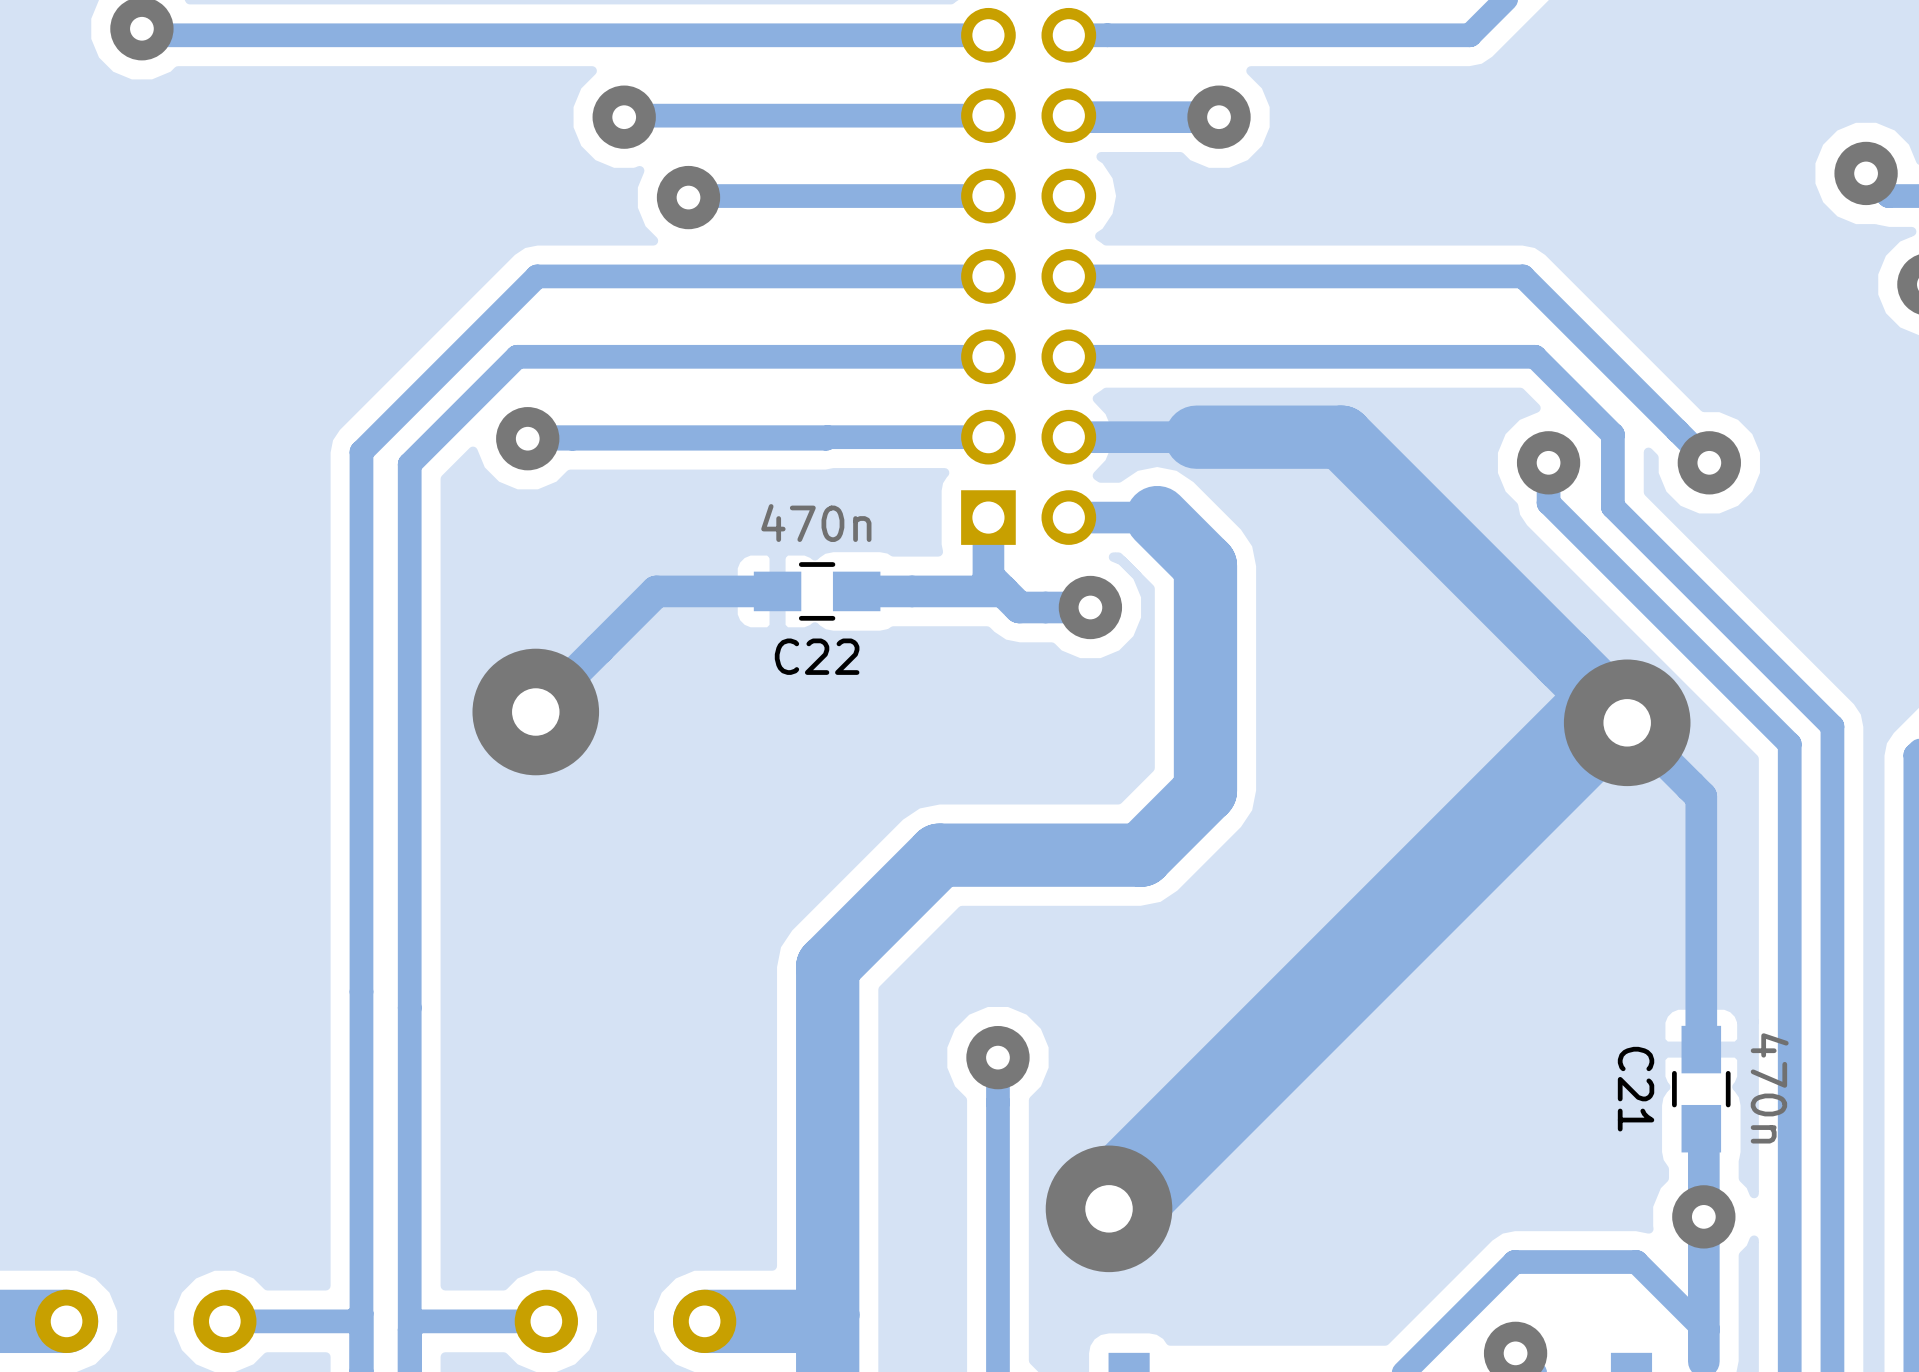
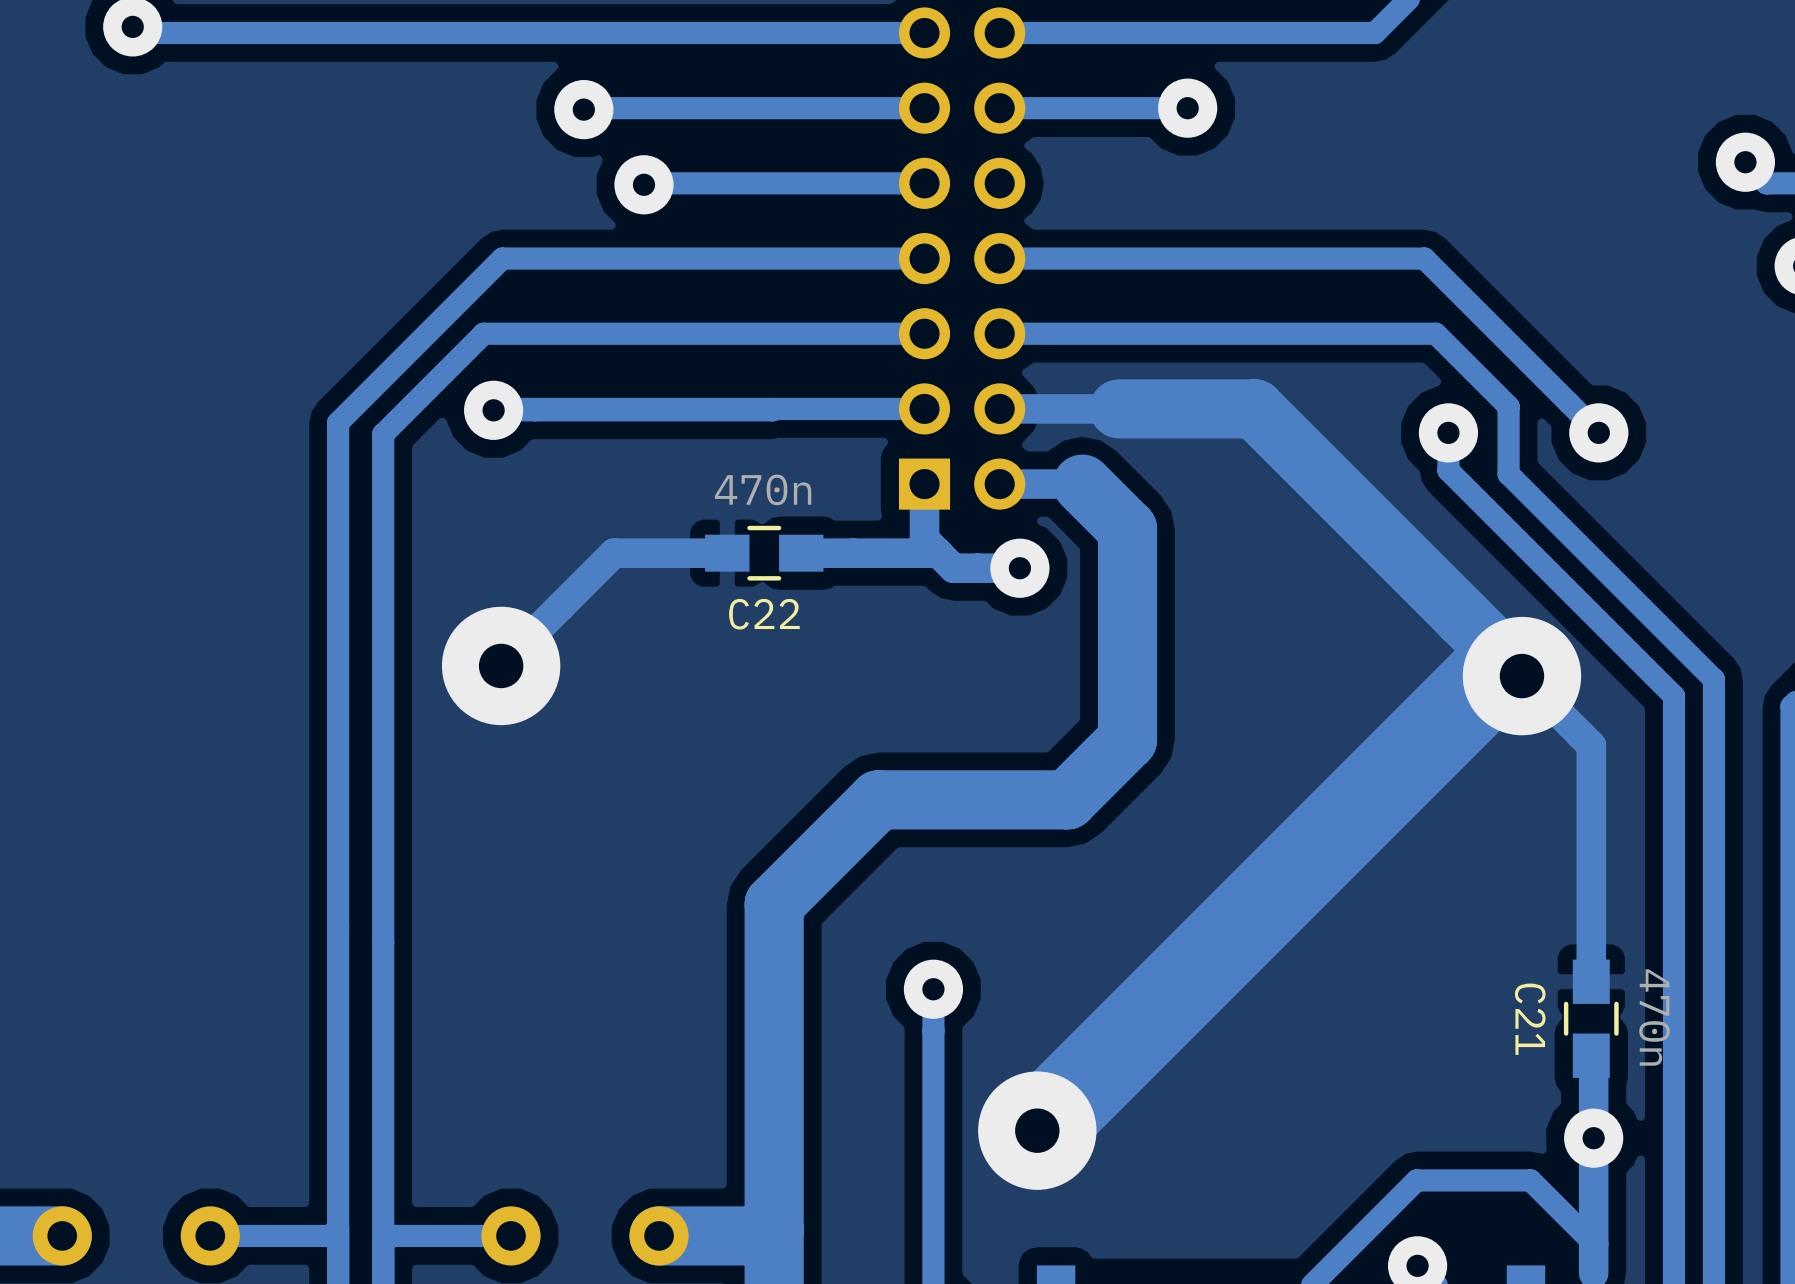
track: (1068, 115) (1070, 117) (1219, 117) -> (999, 108) (1187, 108)
via position: (1219, 117) -> (1187, 108)

